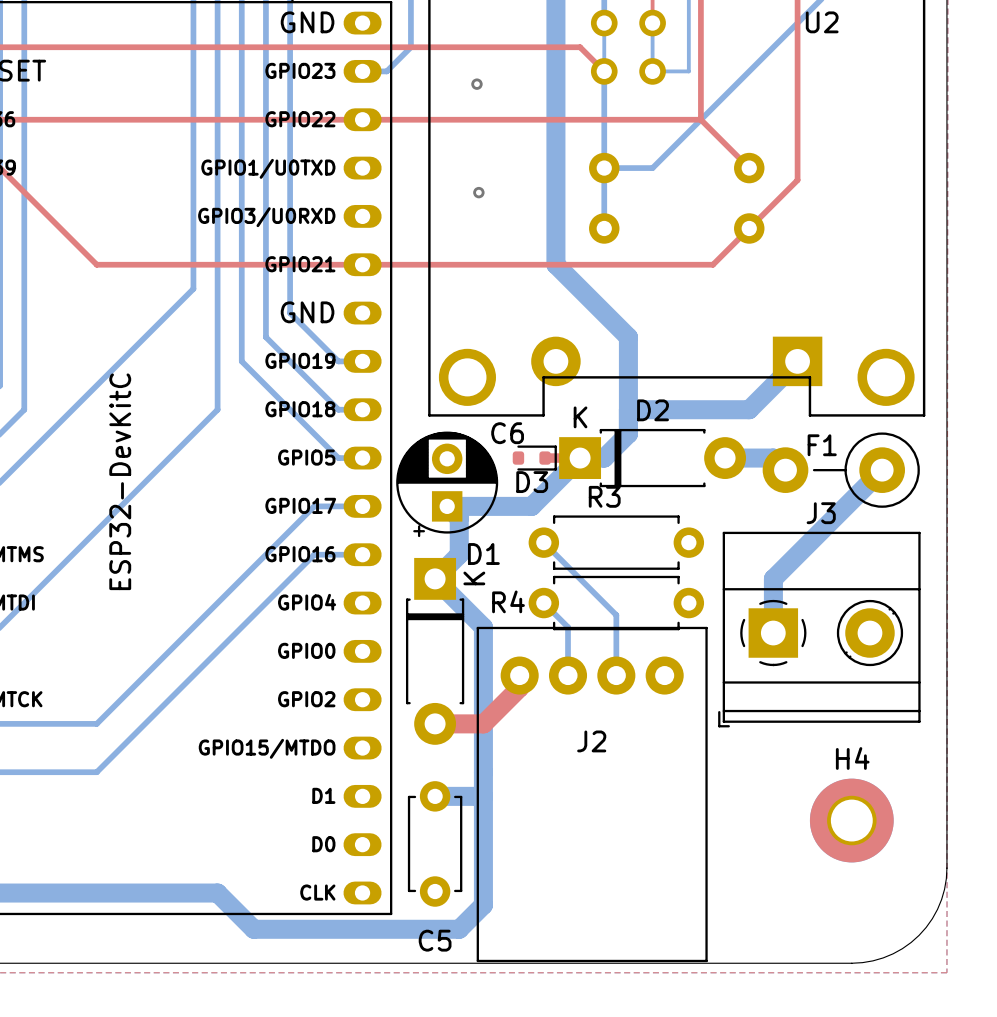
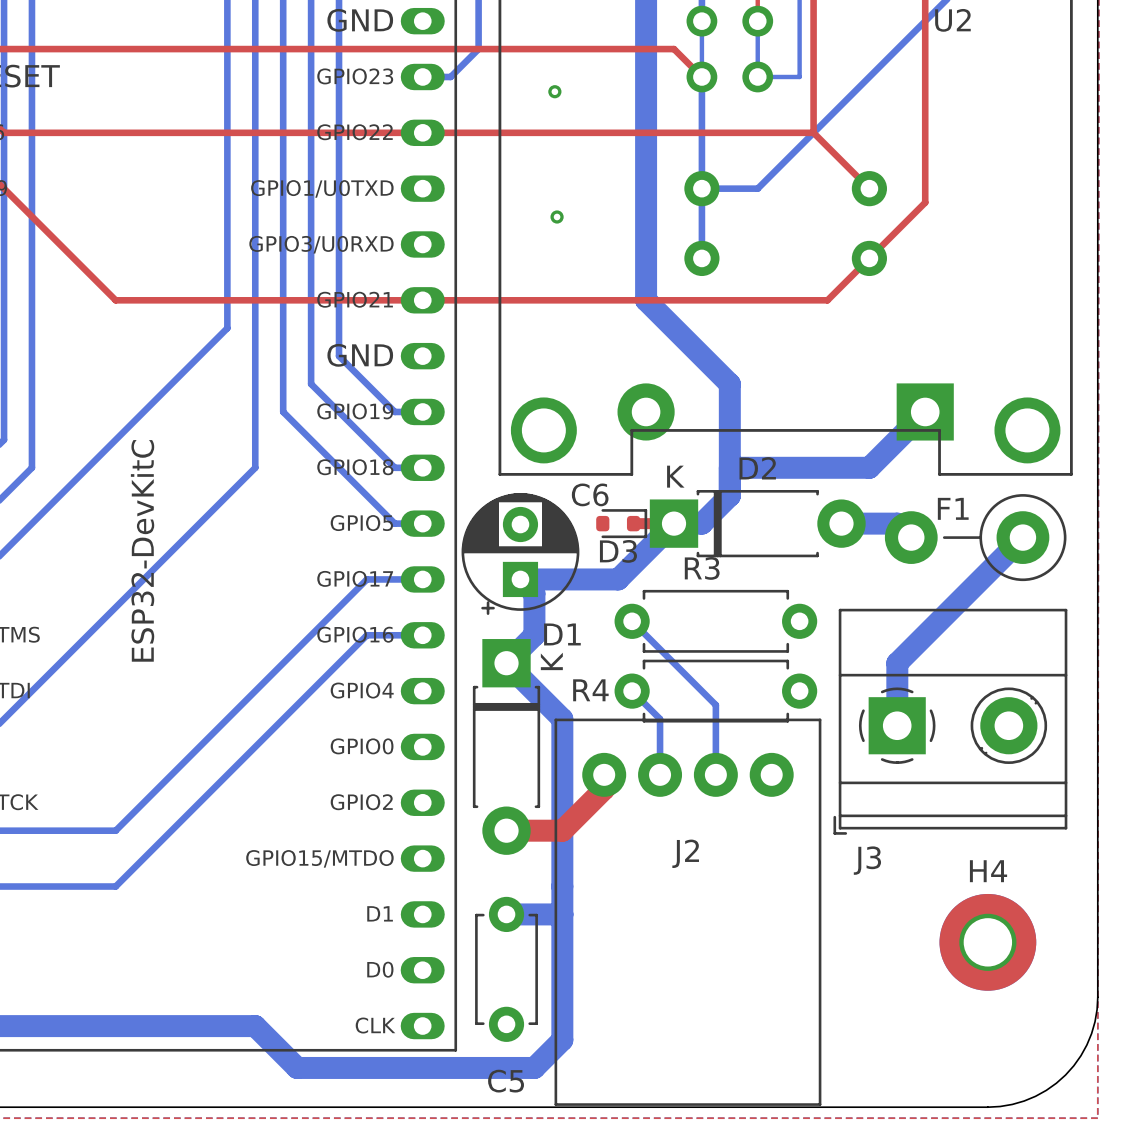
J3 name position: J3 (821, 513) -> J3 (867, 860)

